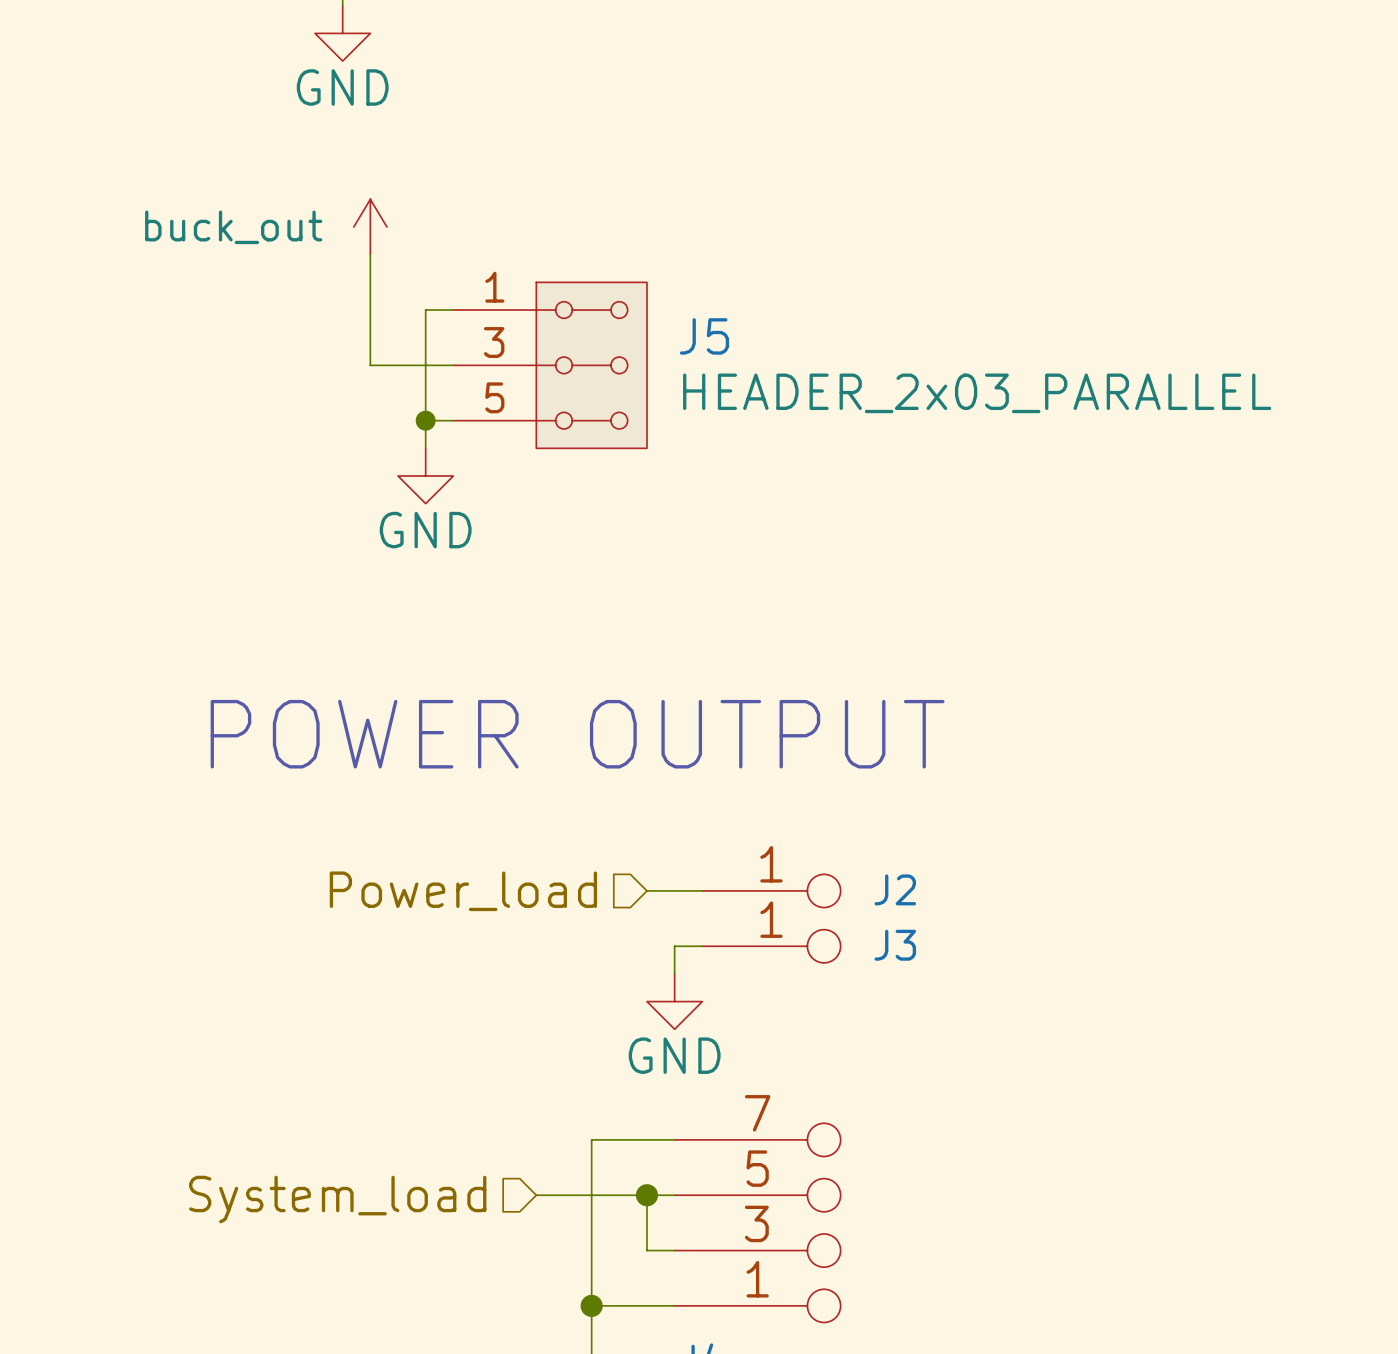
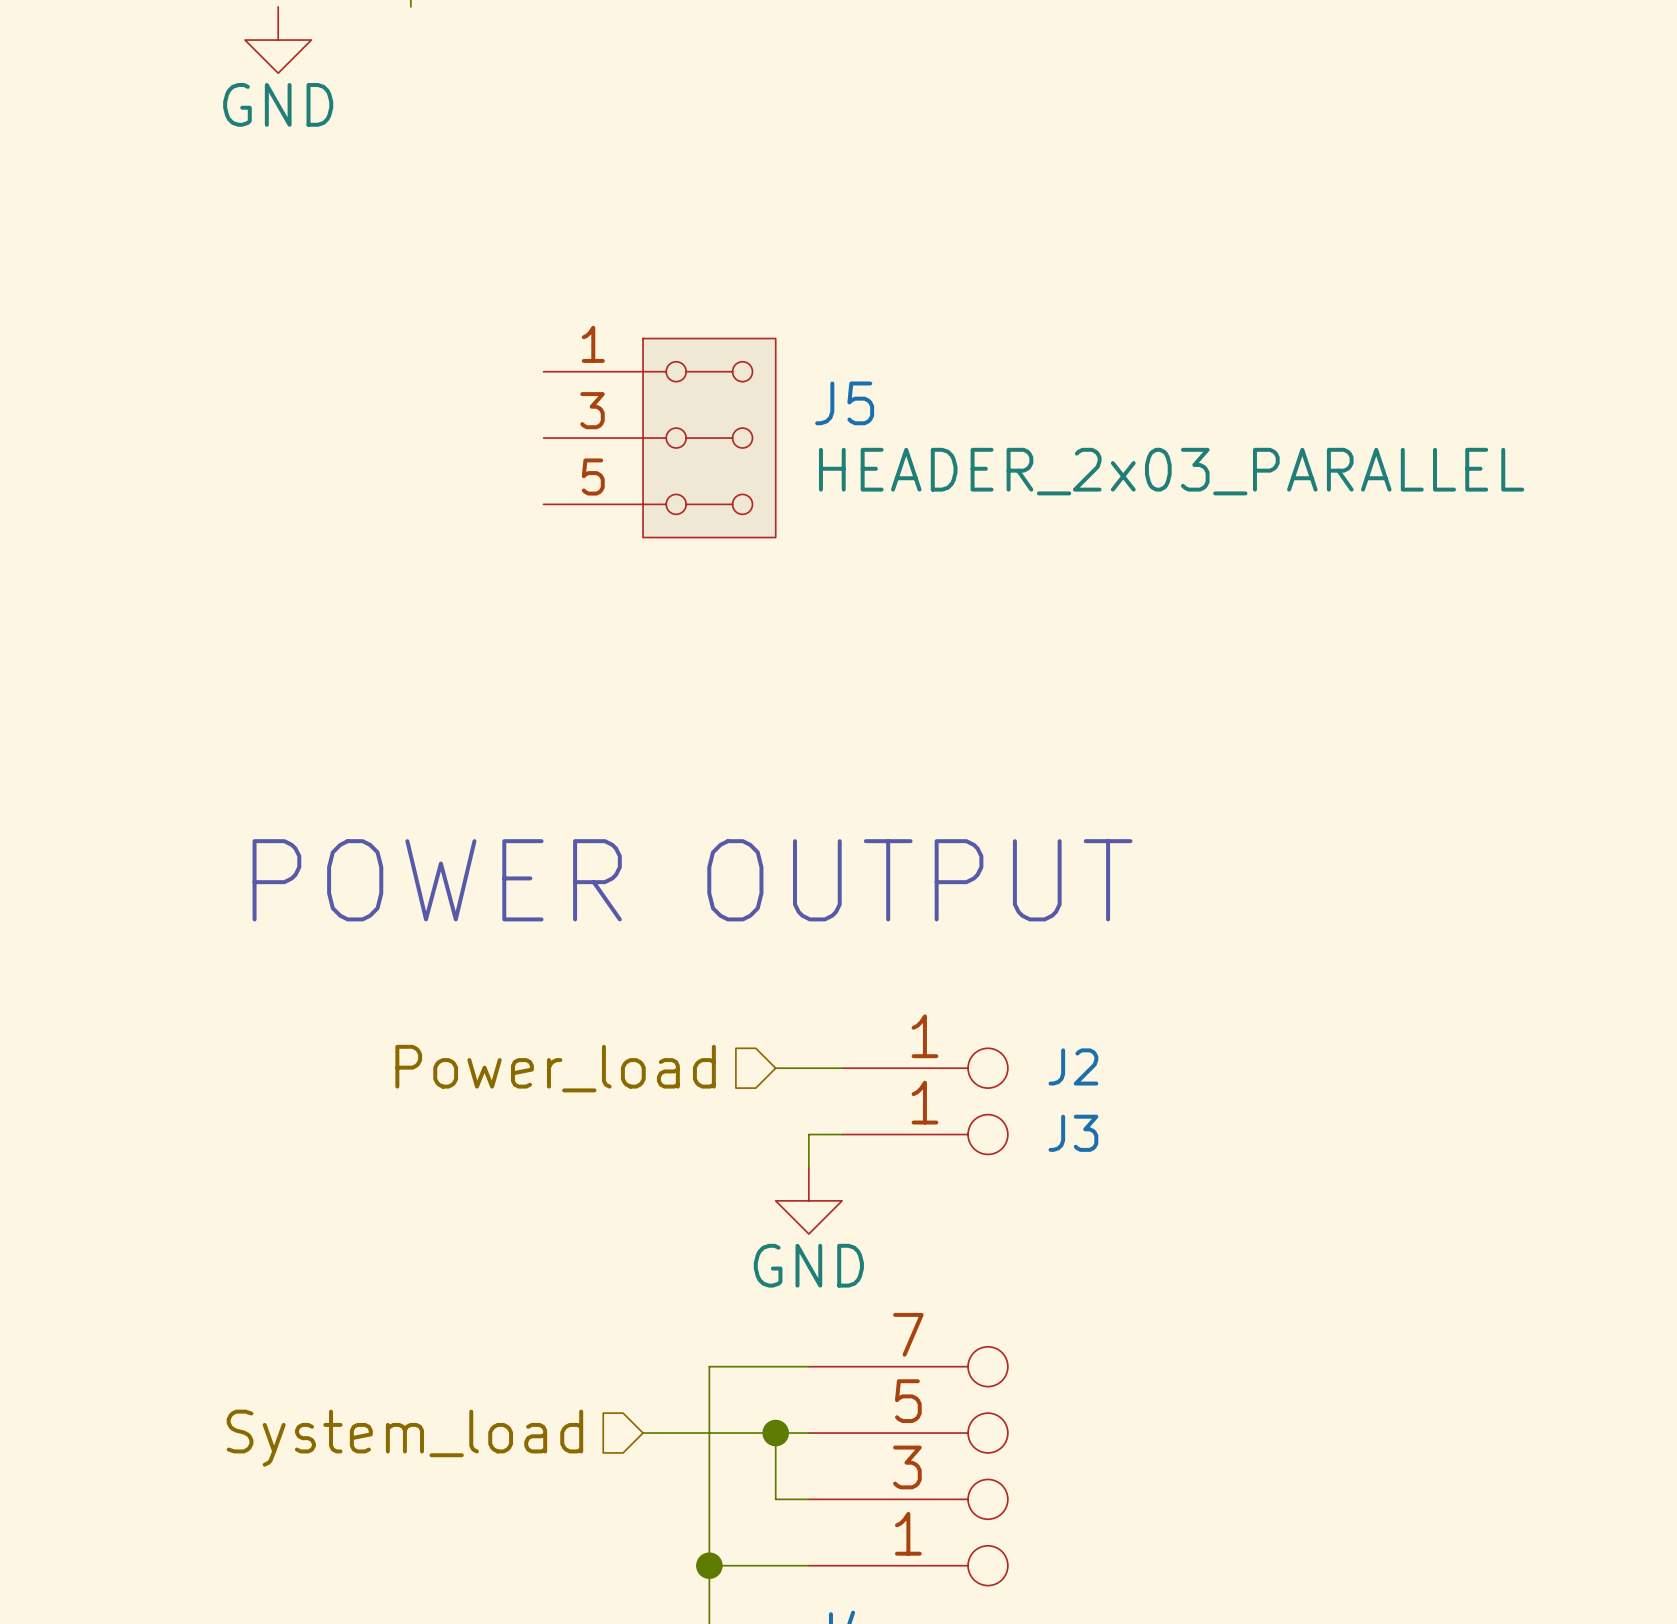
power symbol position: GND (342, 33) -> GND (278, 40)
power symbol: buck_out (370, 227) -> none
wire: (370, 254) (370, 365) (453, 365) -> none
wire: (453, 310) (425, 310) (425, 448) -> none
wire: (425, 420) (453, 420) -> none
junction: (425, 420) -> none
power symbol: GND (425, 476) -> none

